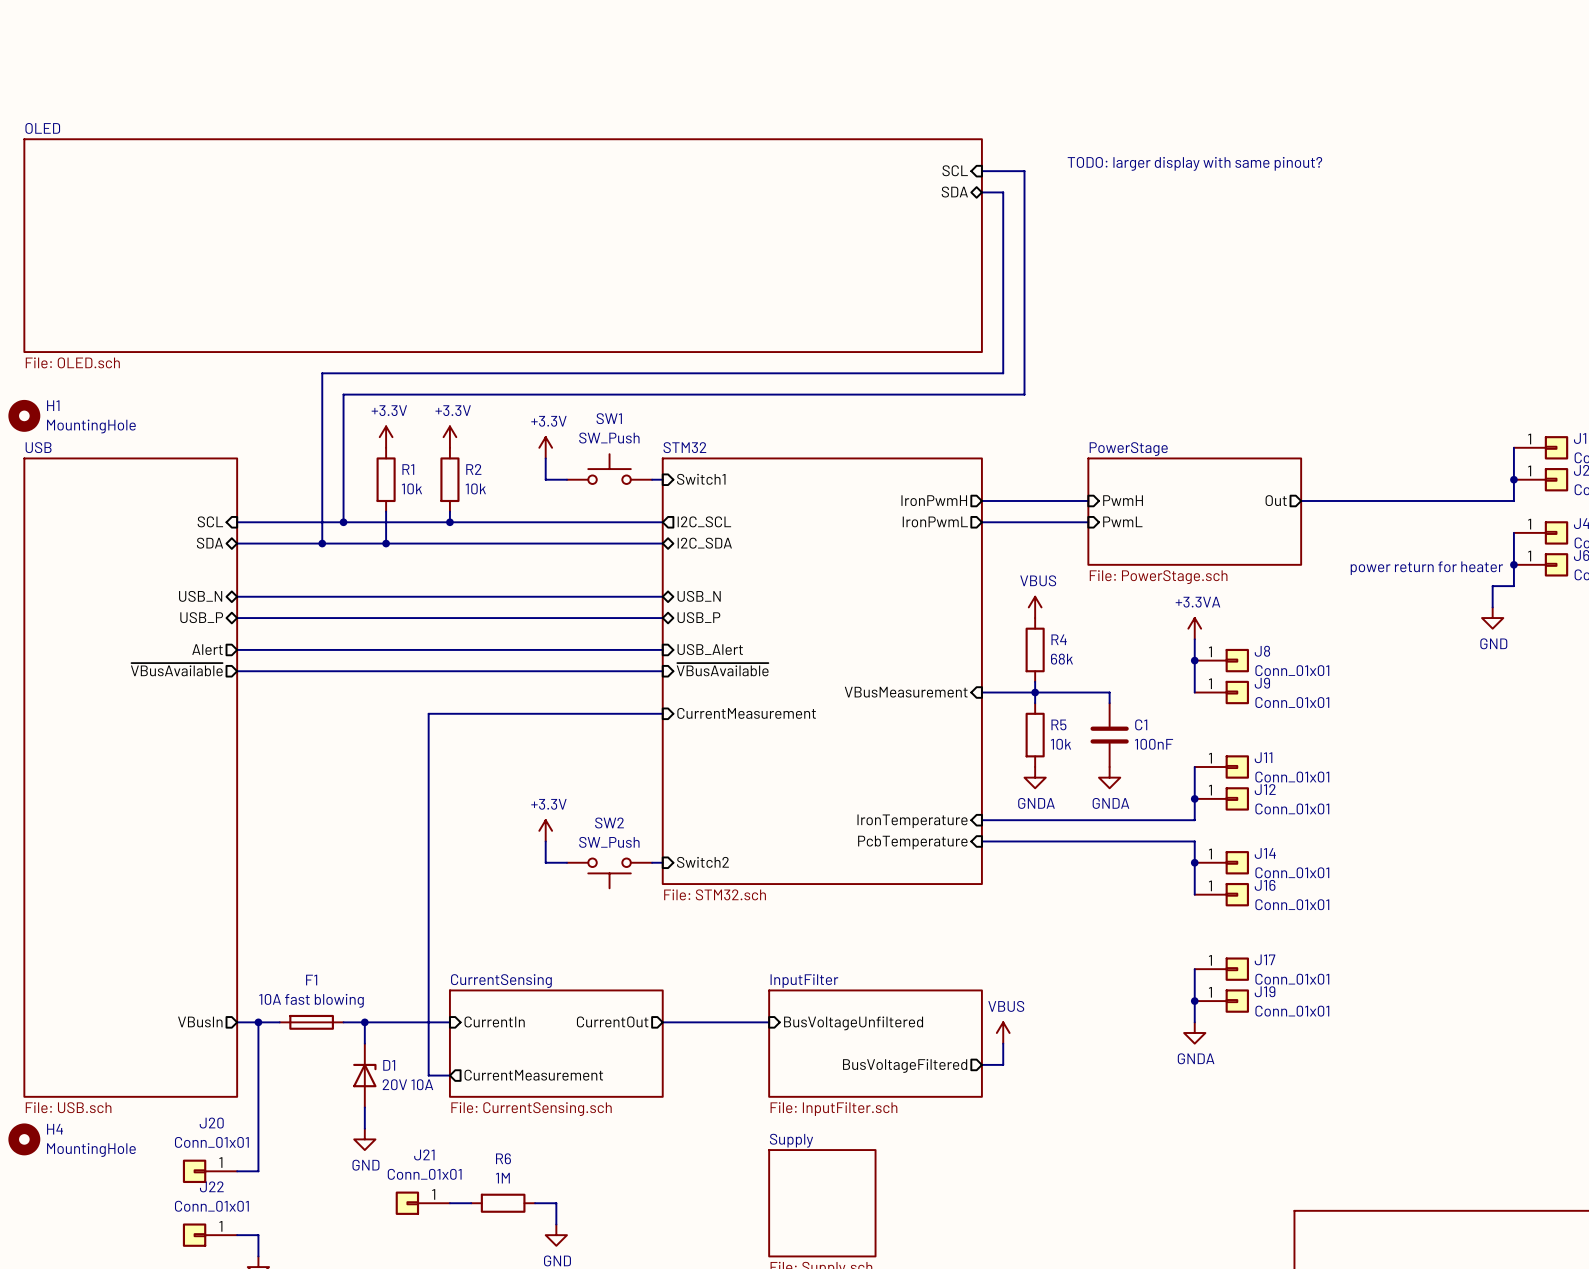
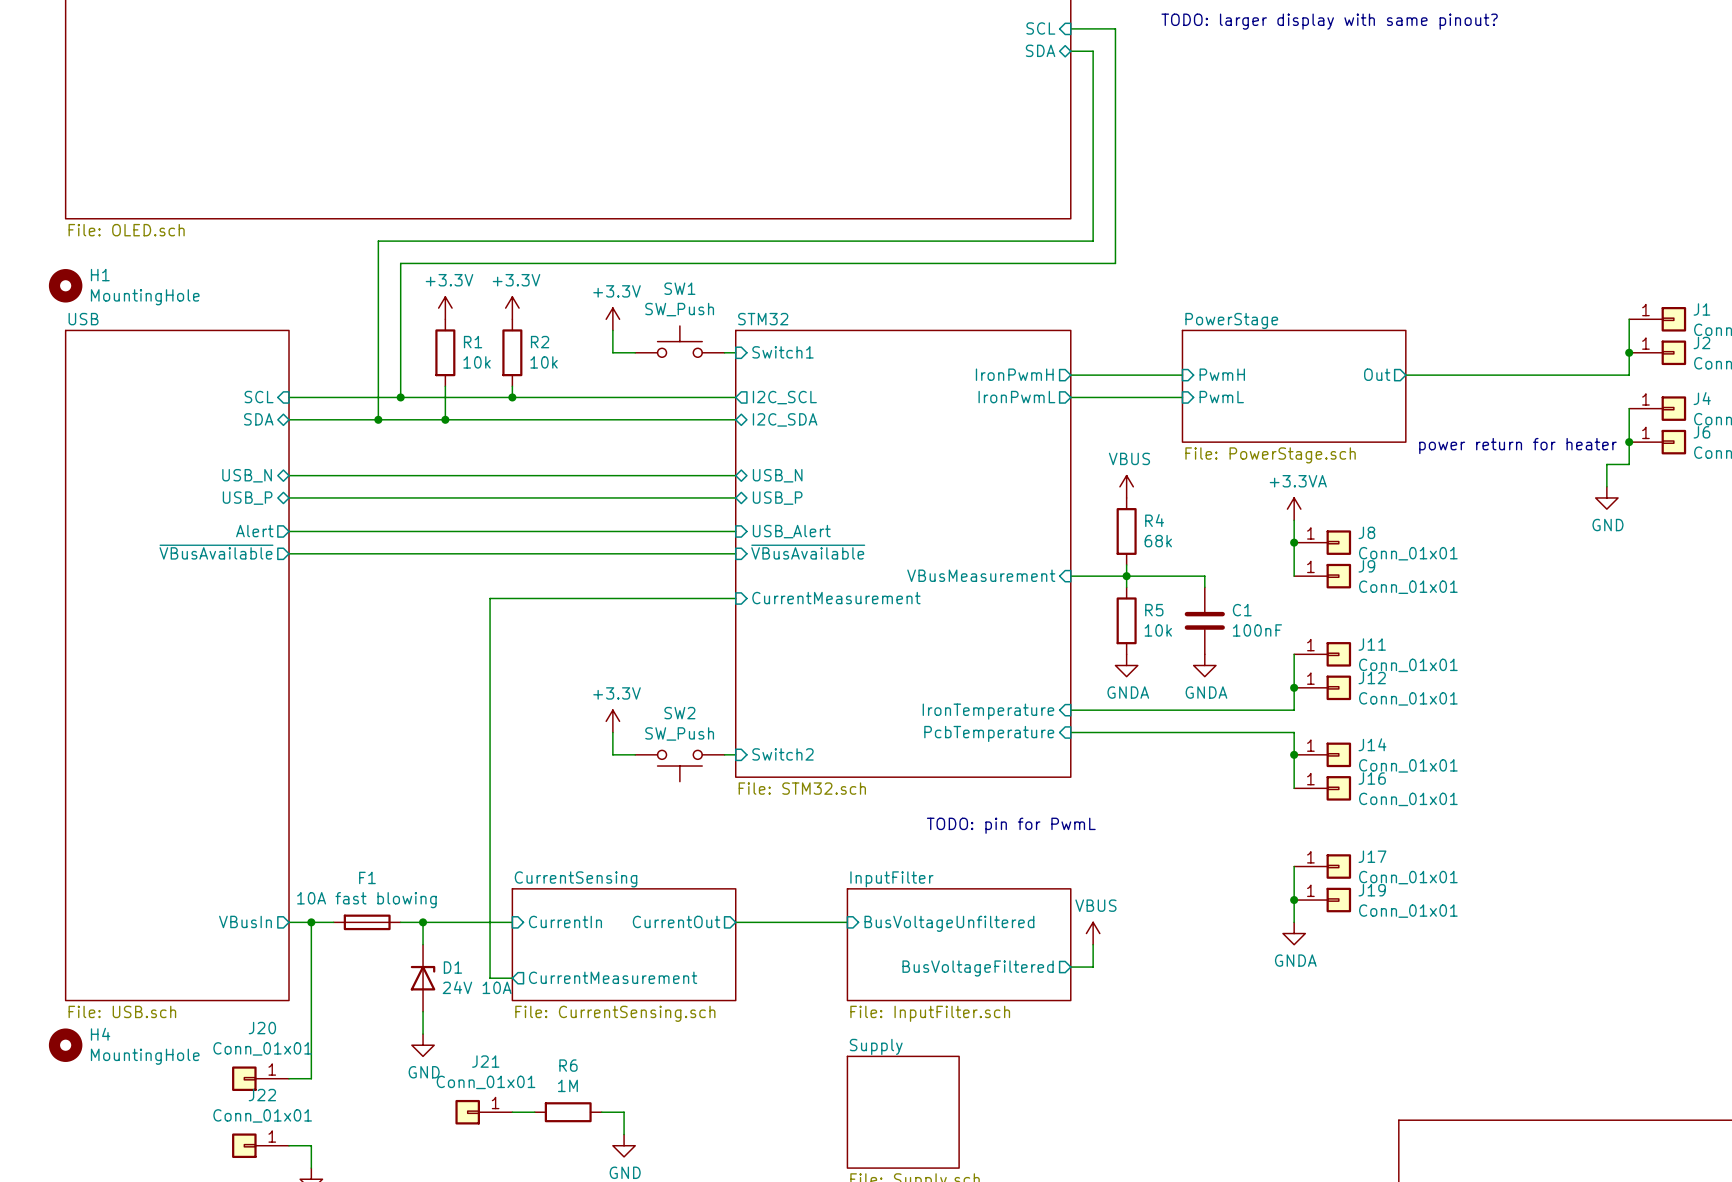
text: none -> TODO: pin for PwmL (1011, 825)
D1 value: 20V 10A (407, 1084) -> 24V 10A (477, 987)

